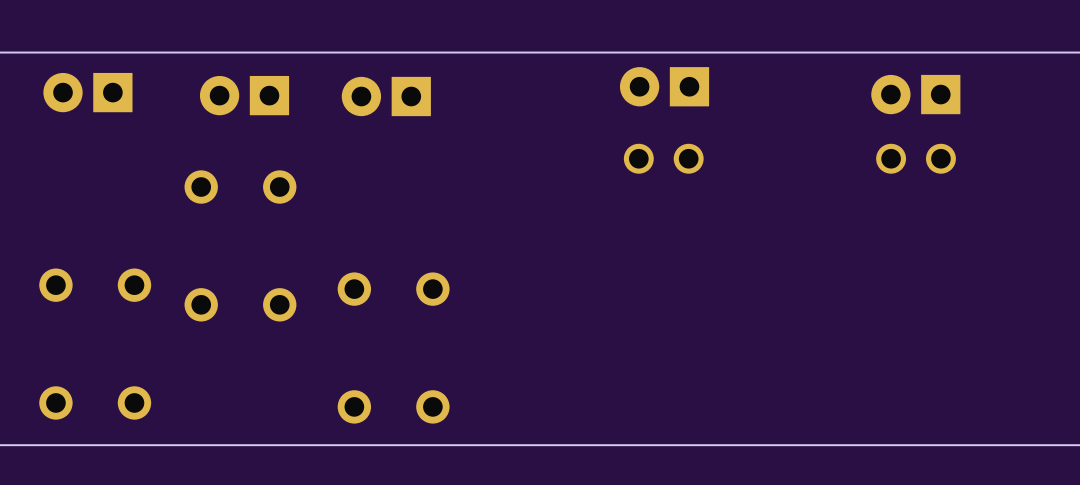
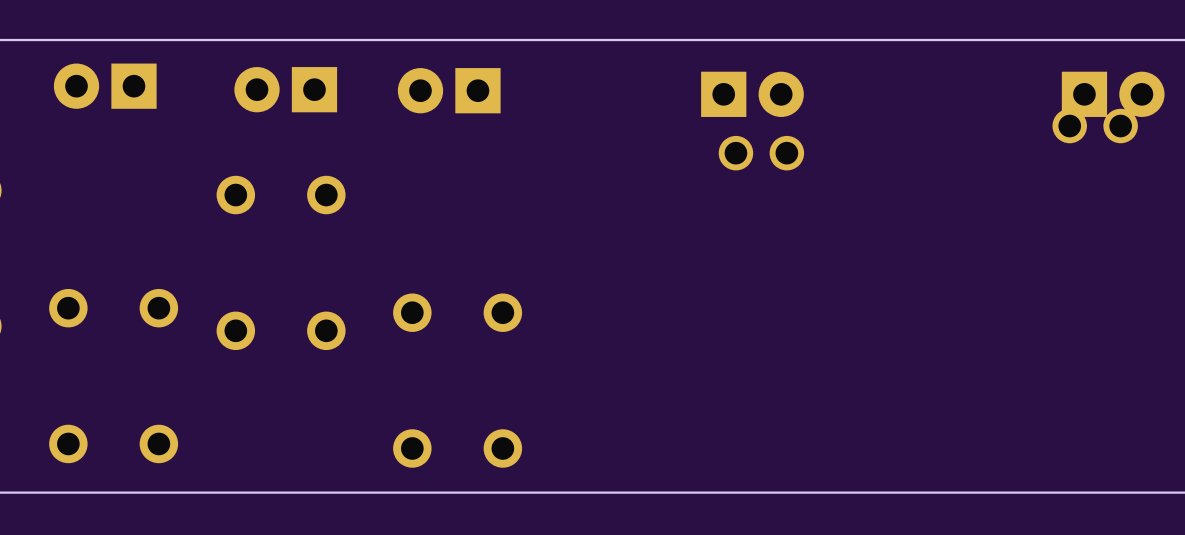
part rotation: 0° (664, 86) -> 180° (752, 94)
part rotation: 0° (915, 94) -> 180° (1113, 94)
part: none -> (1095, 126)
part footprint: [623, 143, 704, 174] -> [718, 135, 805, 171]
part: (916, 158) -> none

